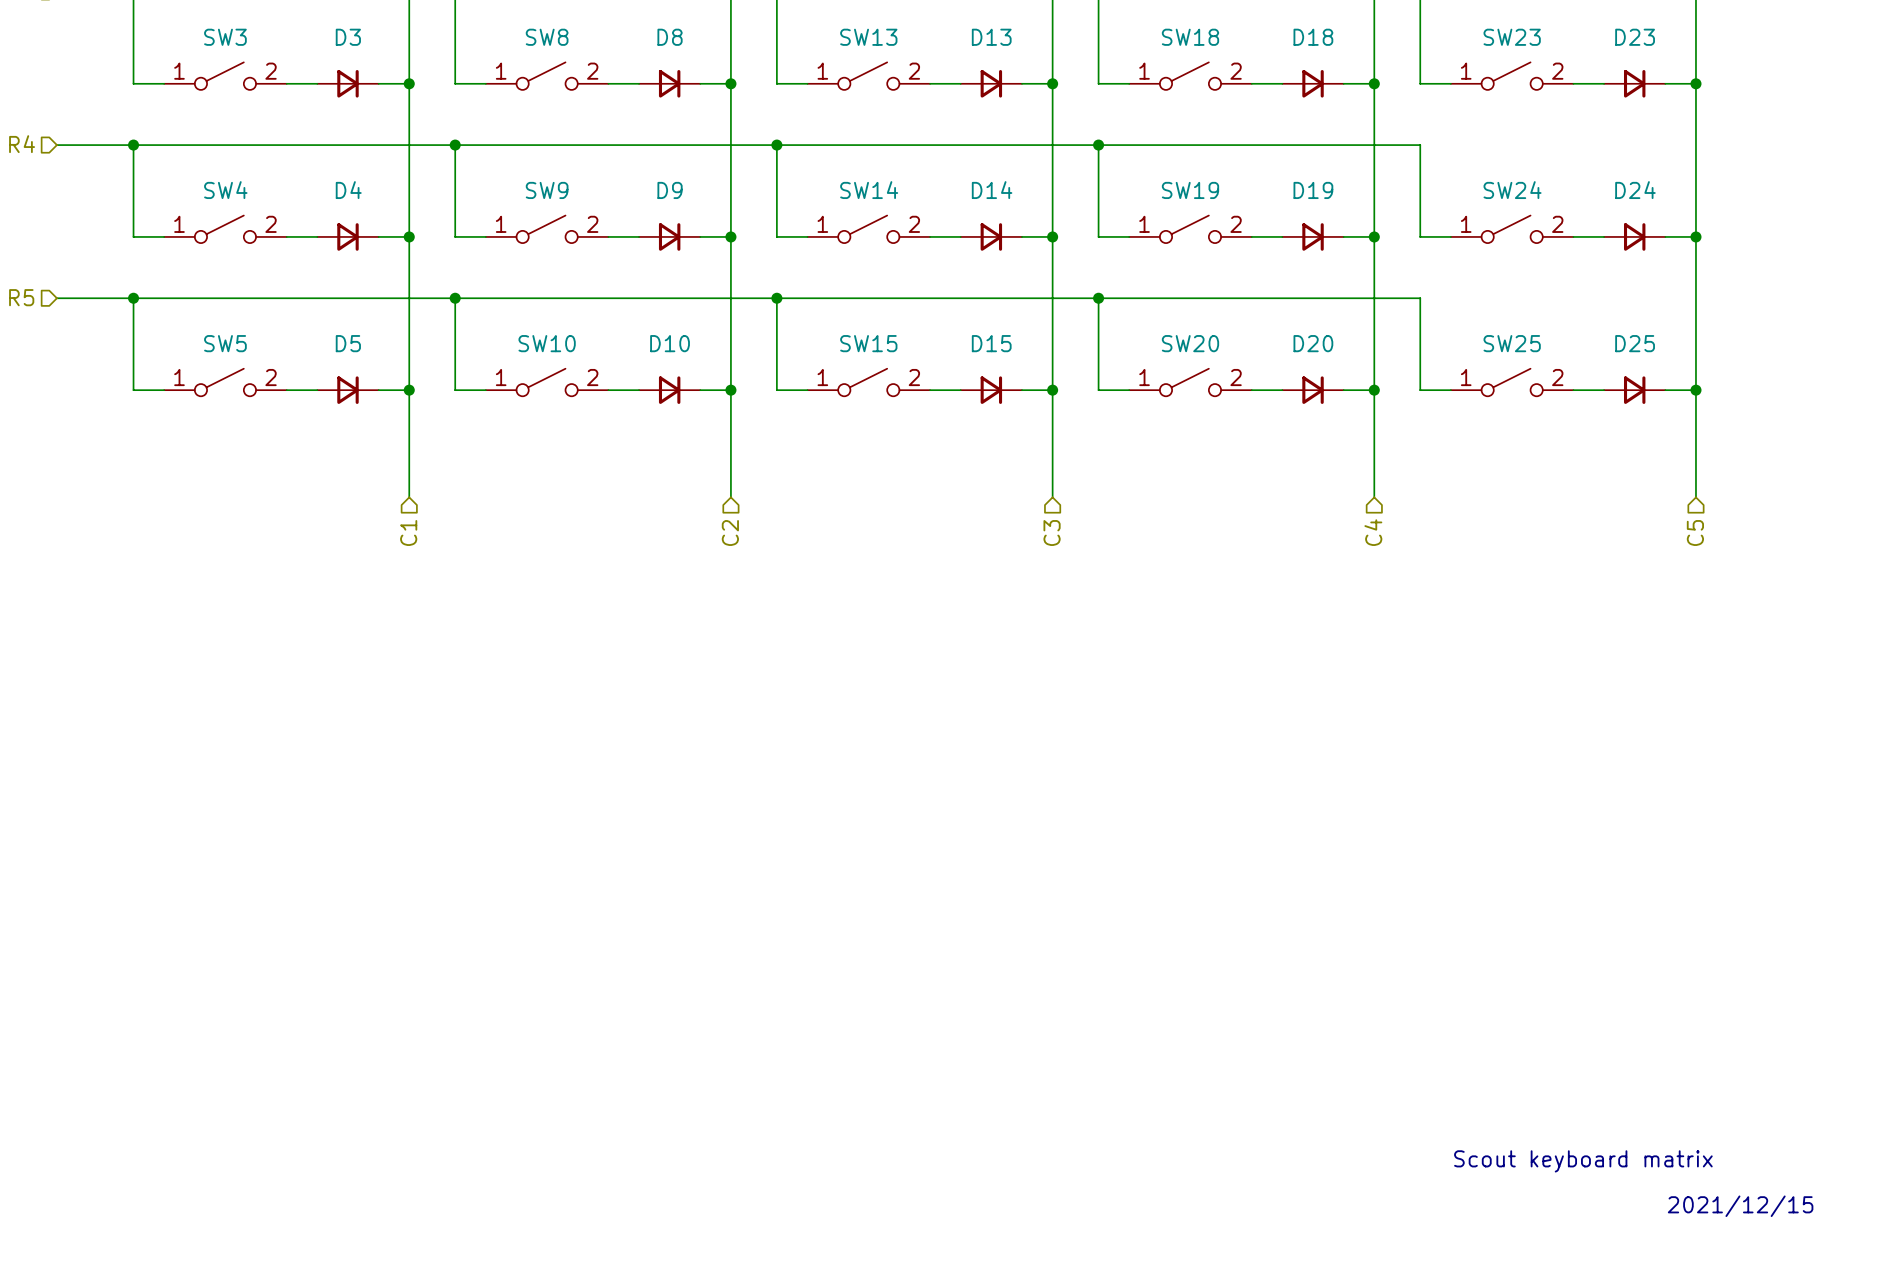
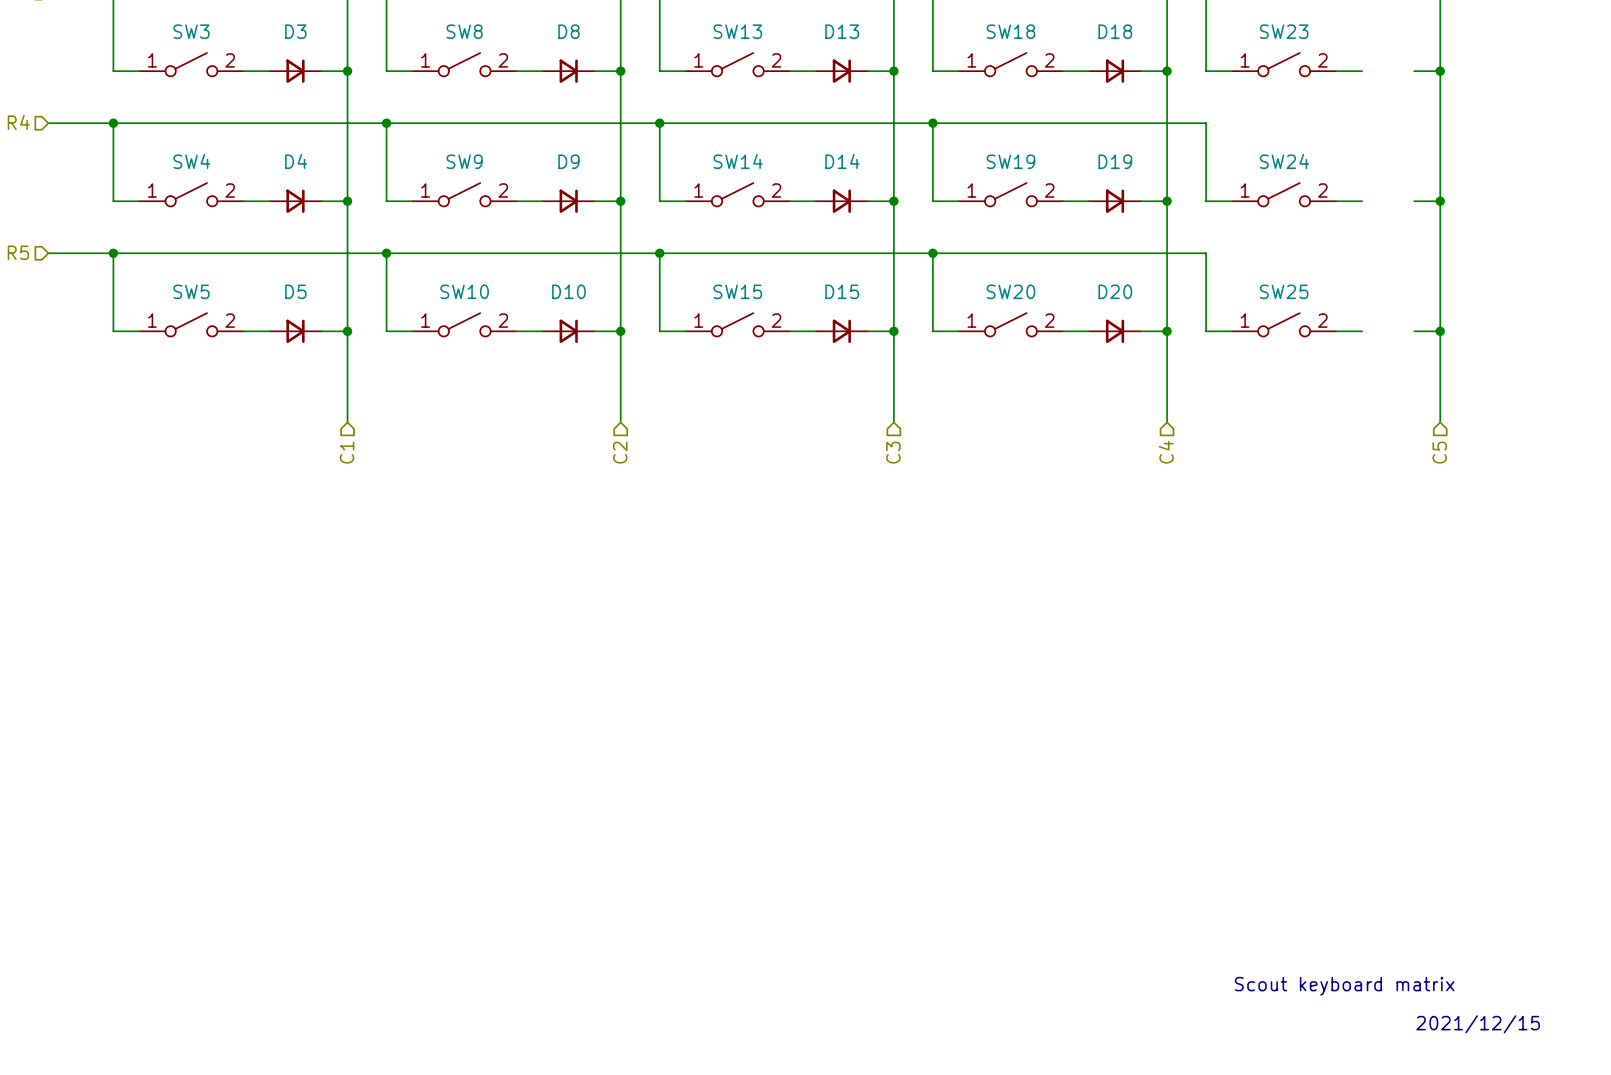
D23: (1634, 83) -> none
D24: (1634, 236) -> none
D25: (1634, 390) -> none

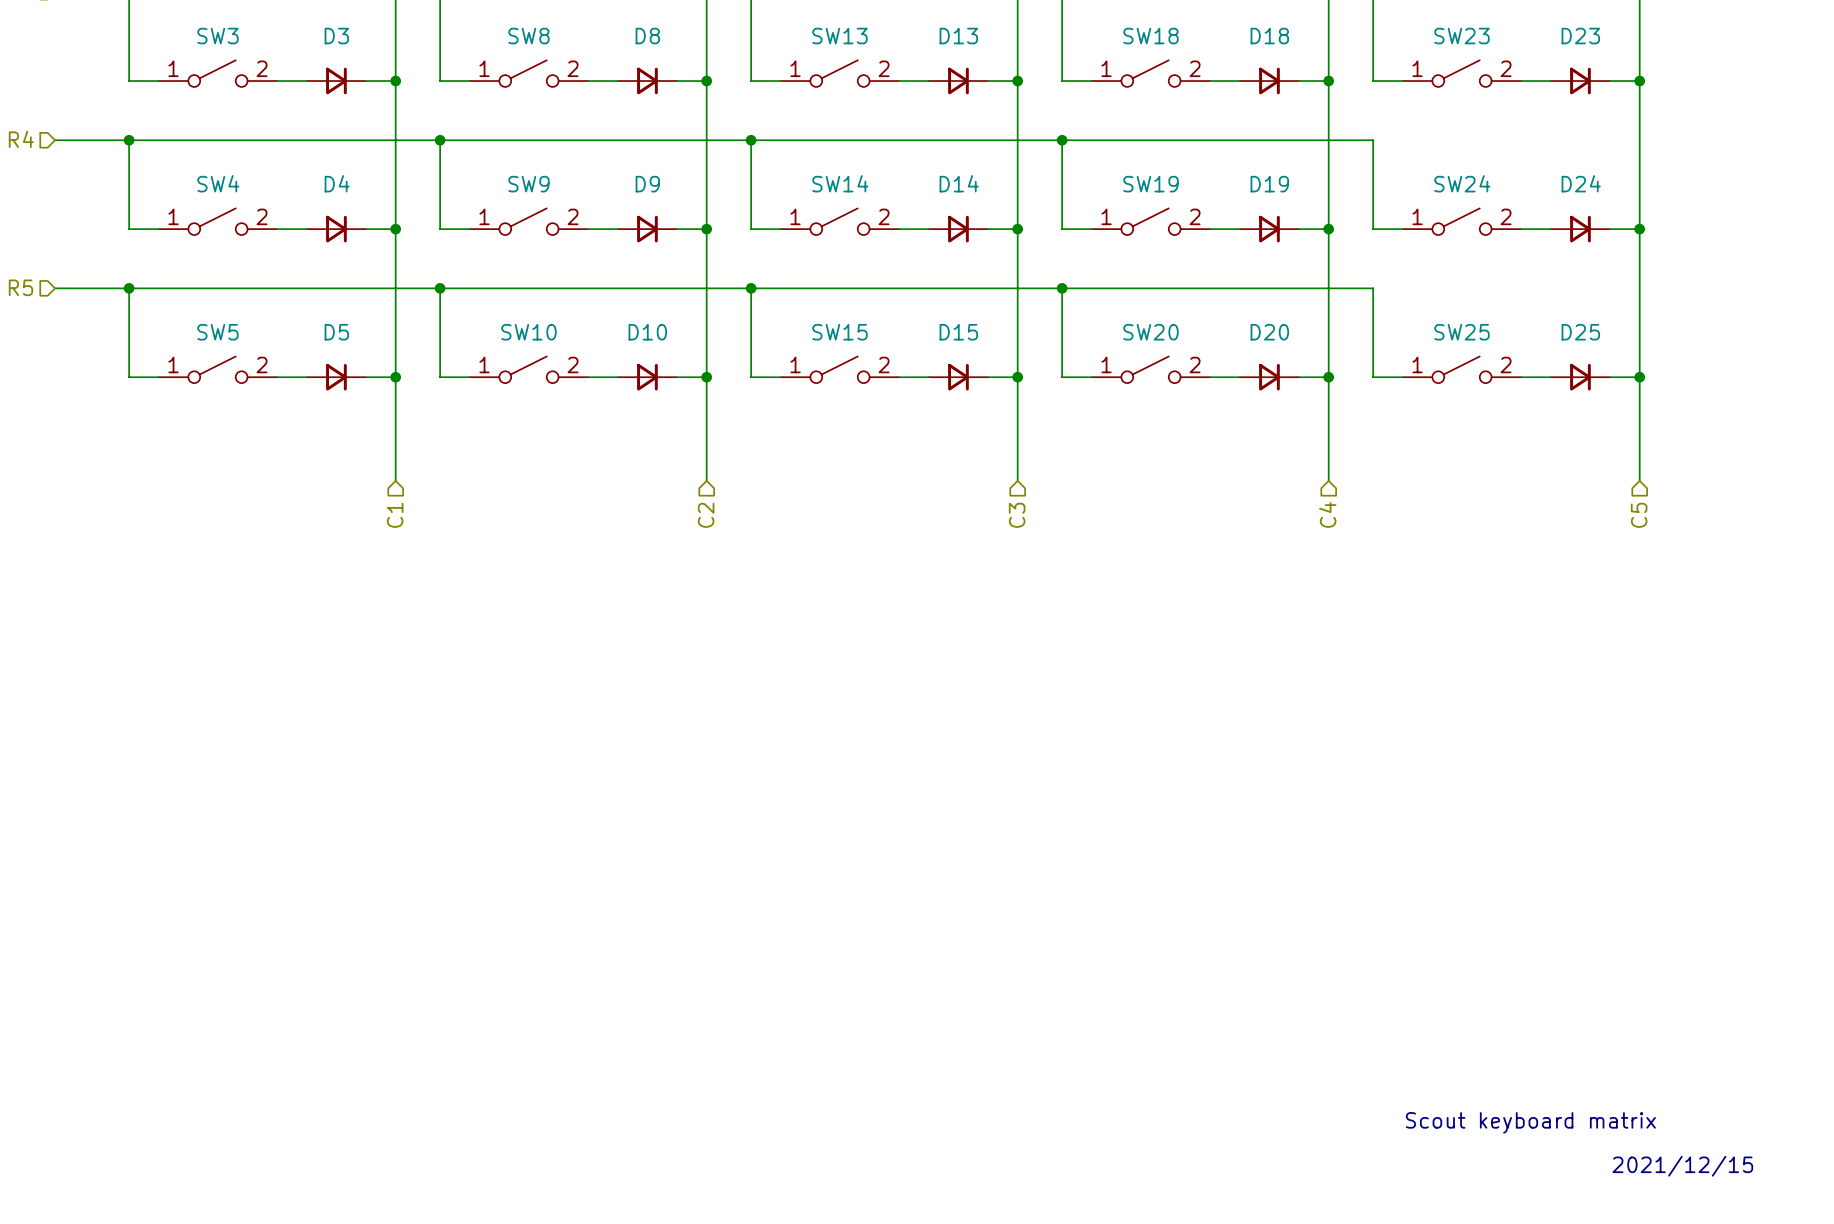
D23: none -> (1580, 81)
D24: none -> (1580, 229)
D25: none -> (1580, 377)

